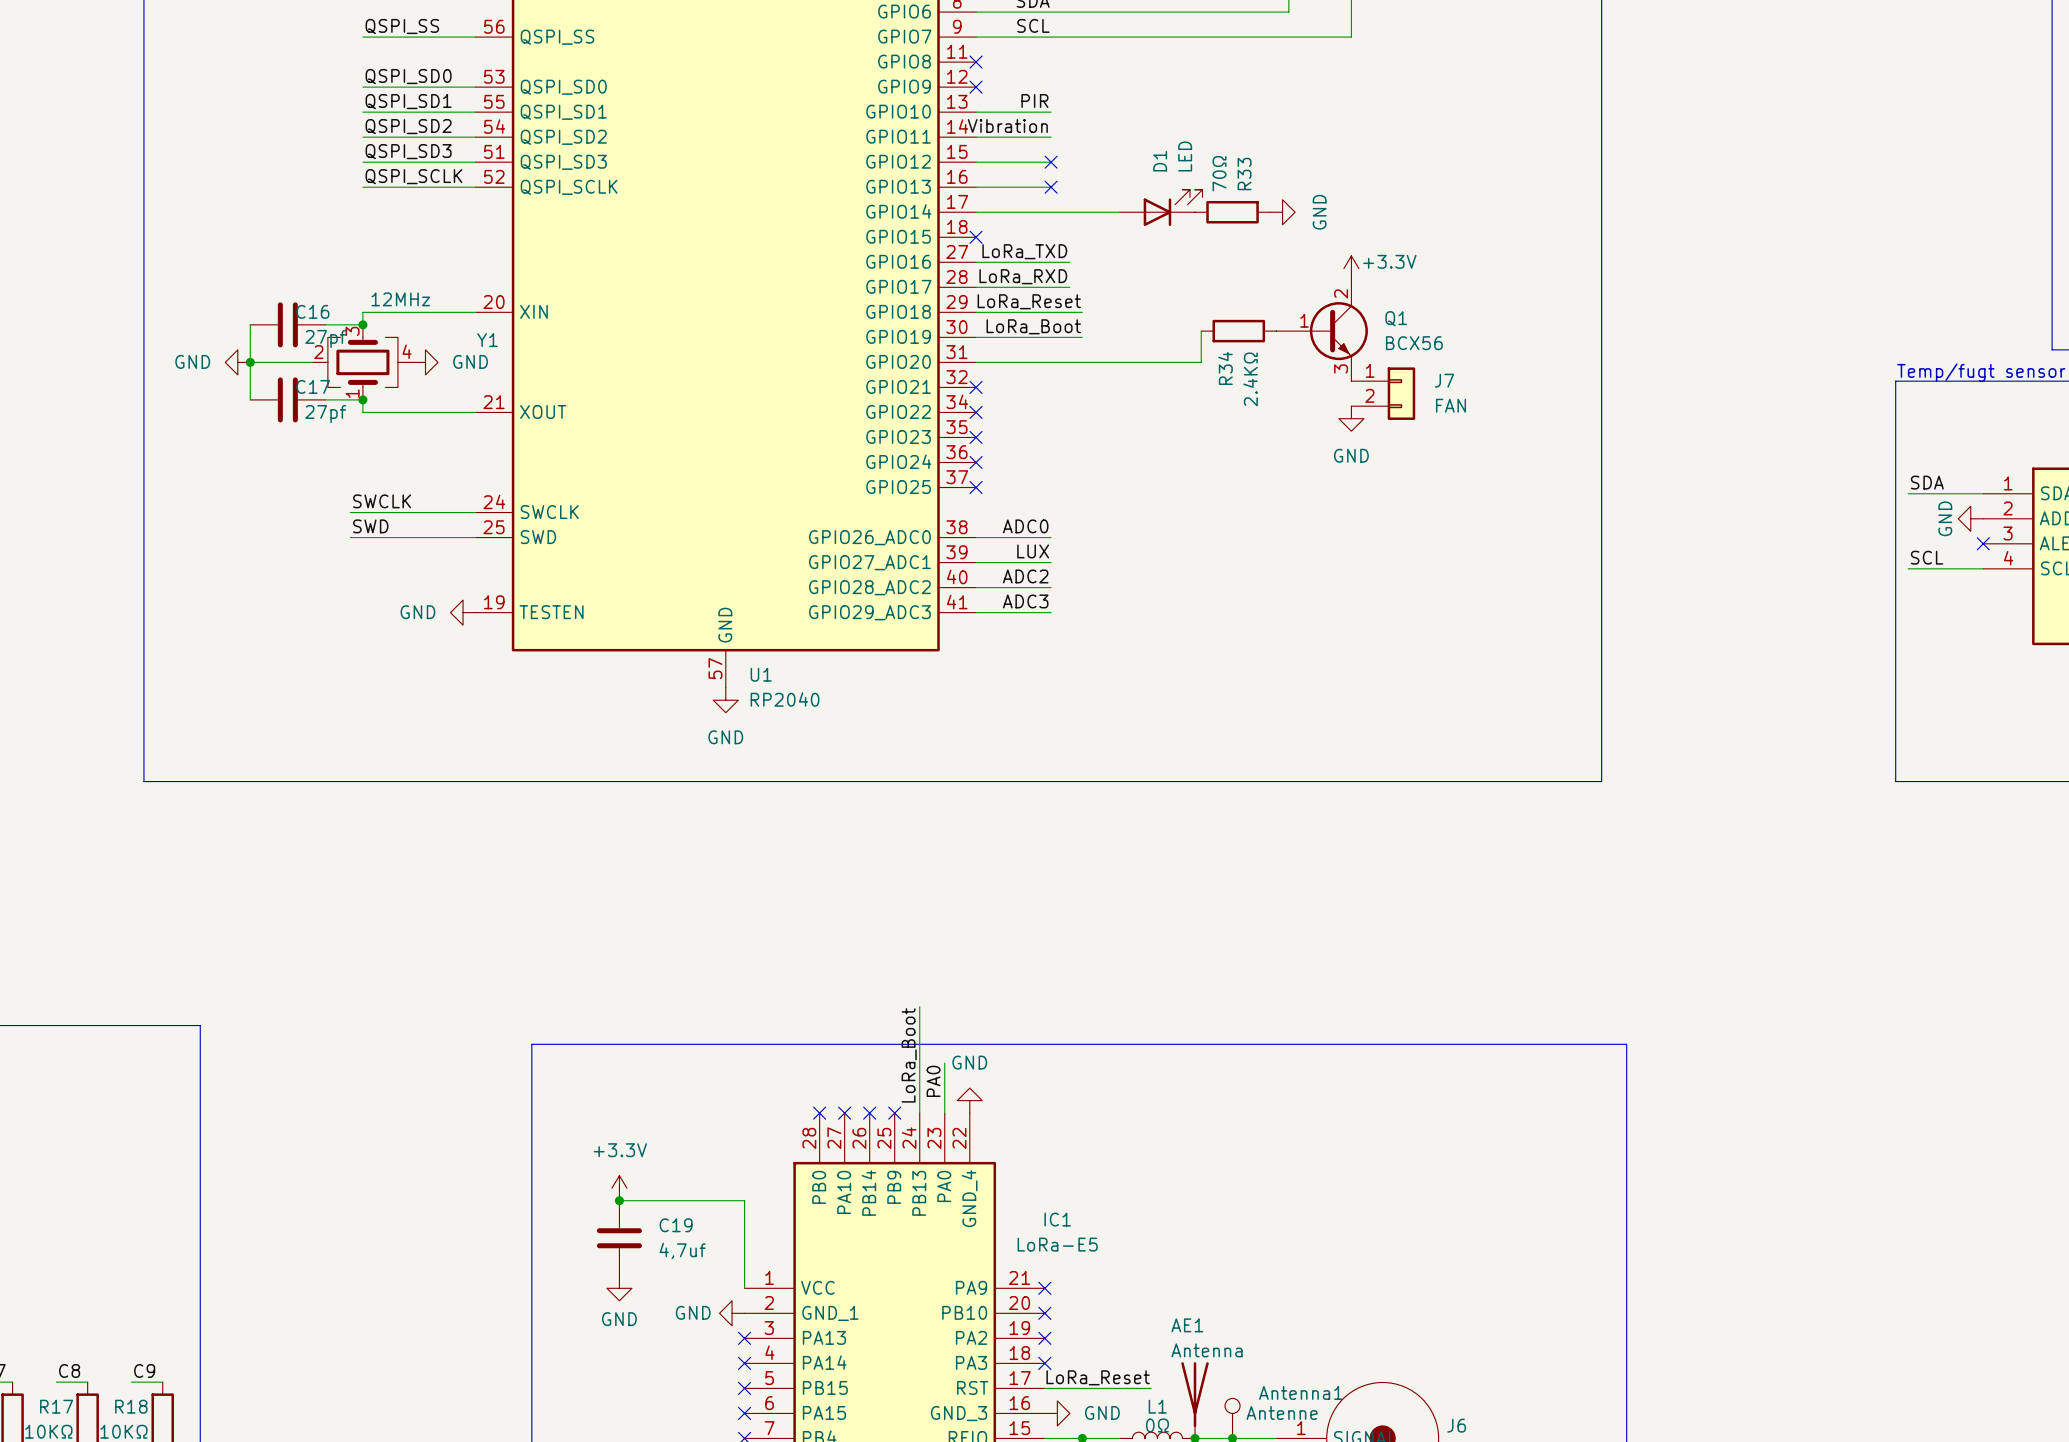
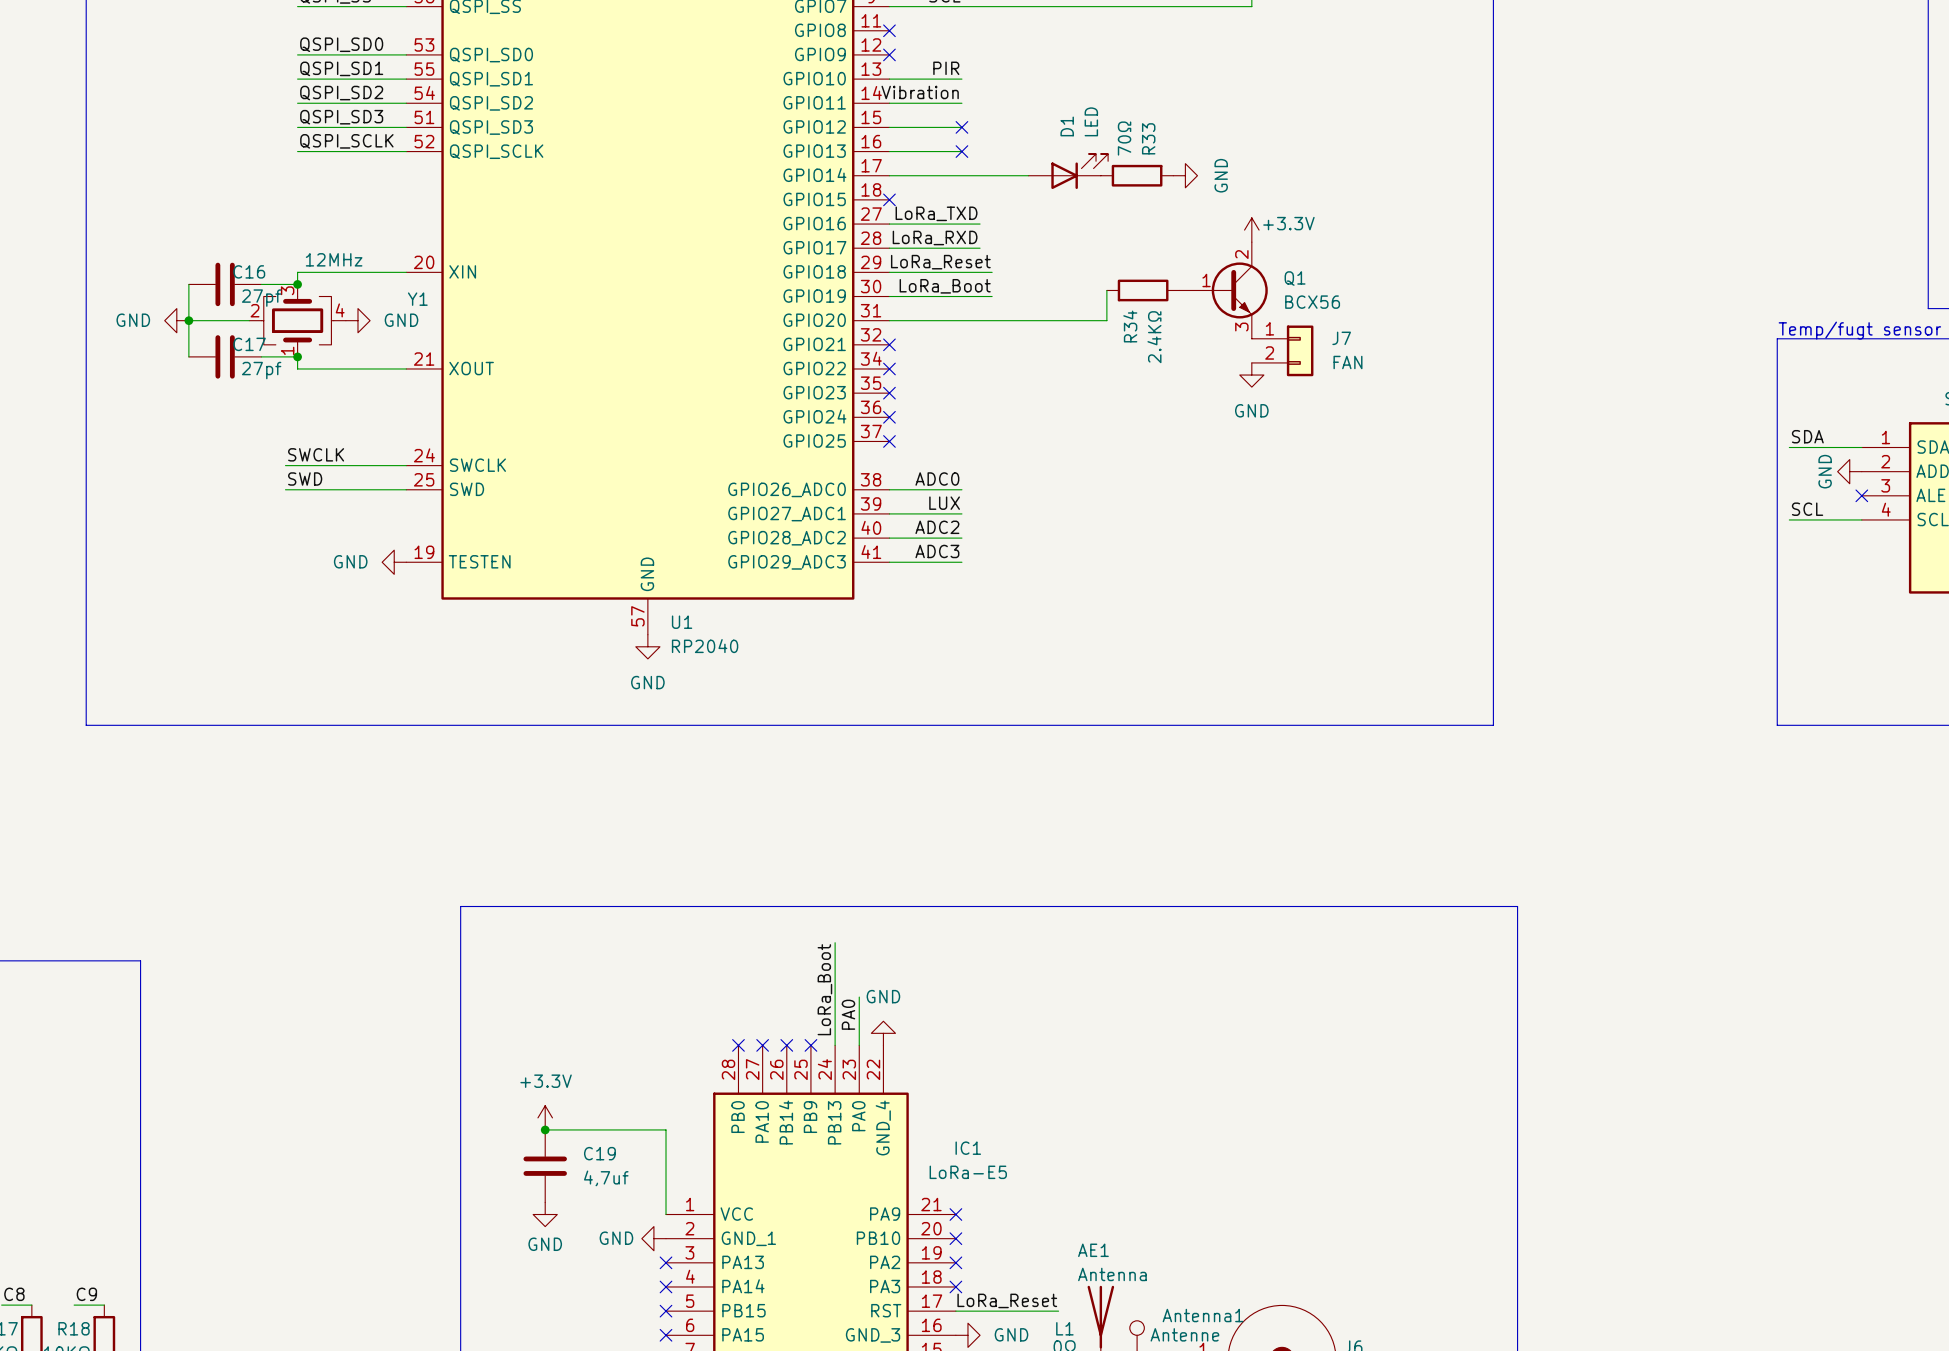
line: (531, 1044) (1626, 1044) -> (460, 978) (460, 906) (1517, 906) (1517, 978)

